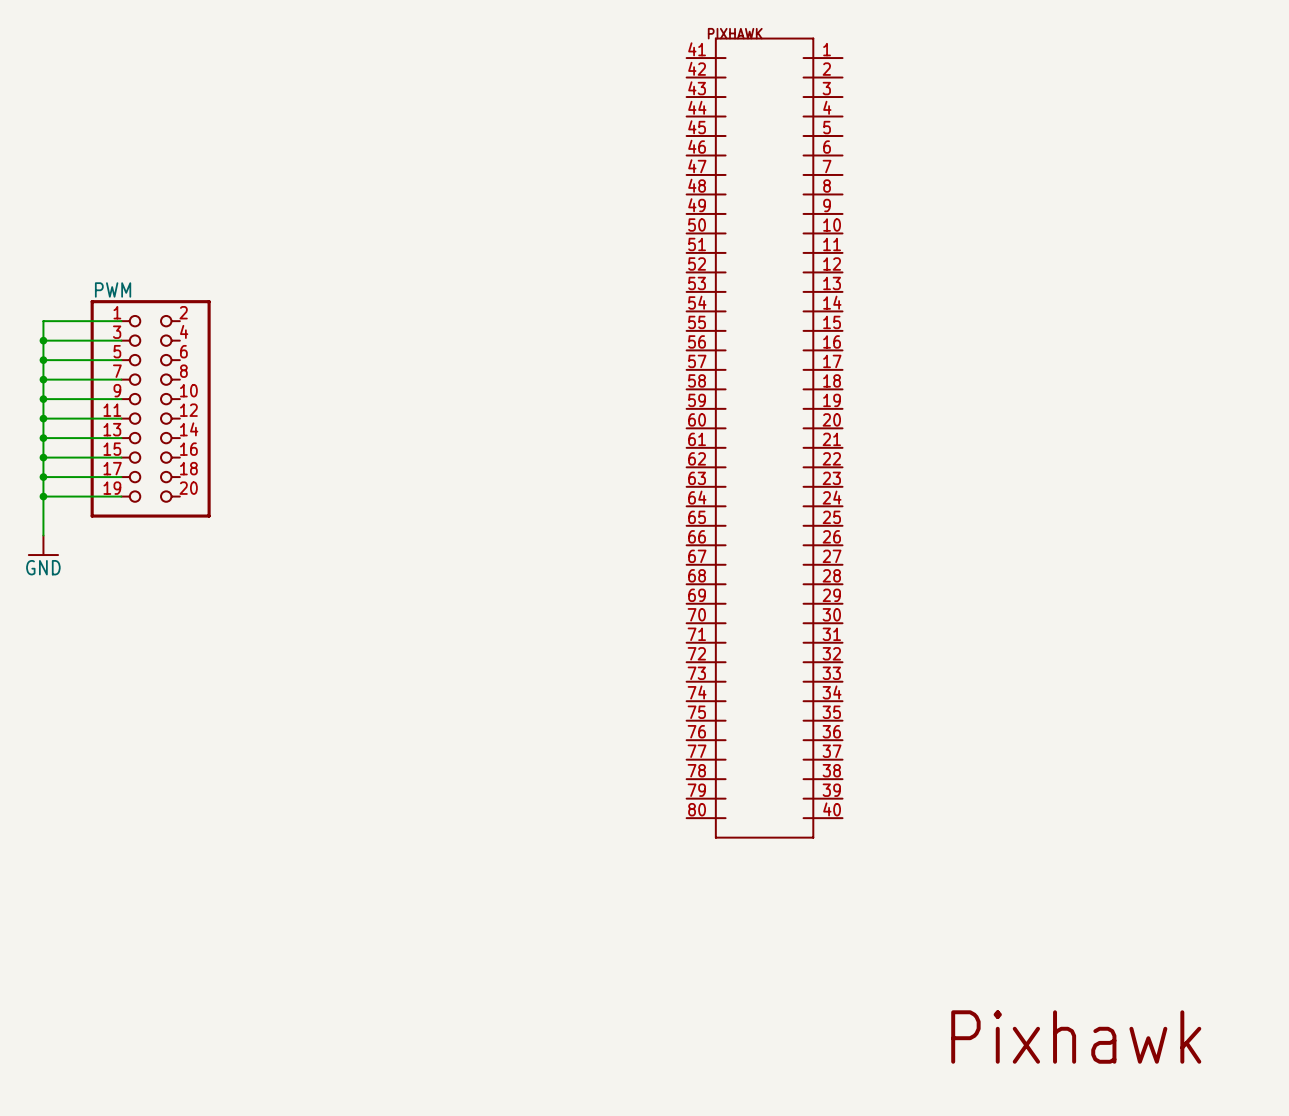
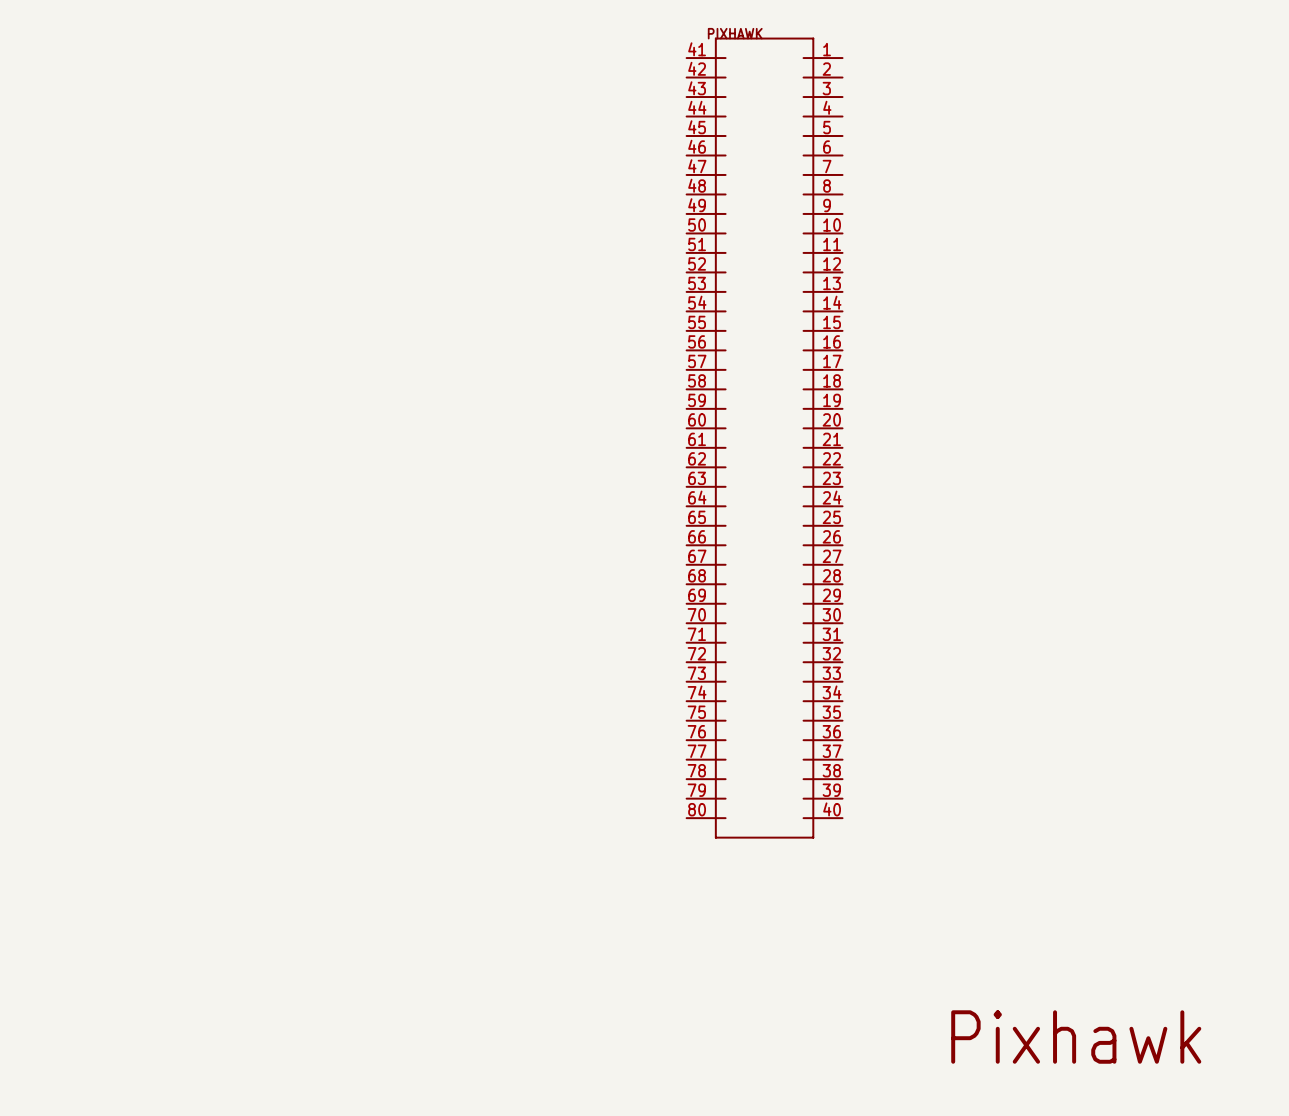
wire: (121, 321) (43, 321) (43, 535) -> none
wire: (43, 340) (121, 340) -> none
junction: (43, 340) -> none
wire: (43, 360) (121, 360) -> none
junction: (43, 360) -> none
wire: (43, 379) (121, 379) -> none
junction: (43, 379) -> none
wire: (43, 399) (121, 399) -> none
junction: (43, 399) -> none
PWM: (150, 408) -> none
wire: (43, 418) (121, 418) -> none
junction: (43, 418) -> none
wire: (43, 438) (121, 438) -> none
junction: (43, 438) -> none
wire: (43, 457) (121, 457) -> none
junction: (43, 457) -> none
wire: (43, 477) (121, 477) -> none
junction: (43, 477) -> none
wire: (43, 496) (121, 496) -> none
junction: (43, 496) -> none
power symbol: GND (43, 545) -> none

